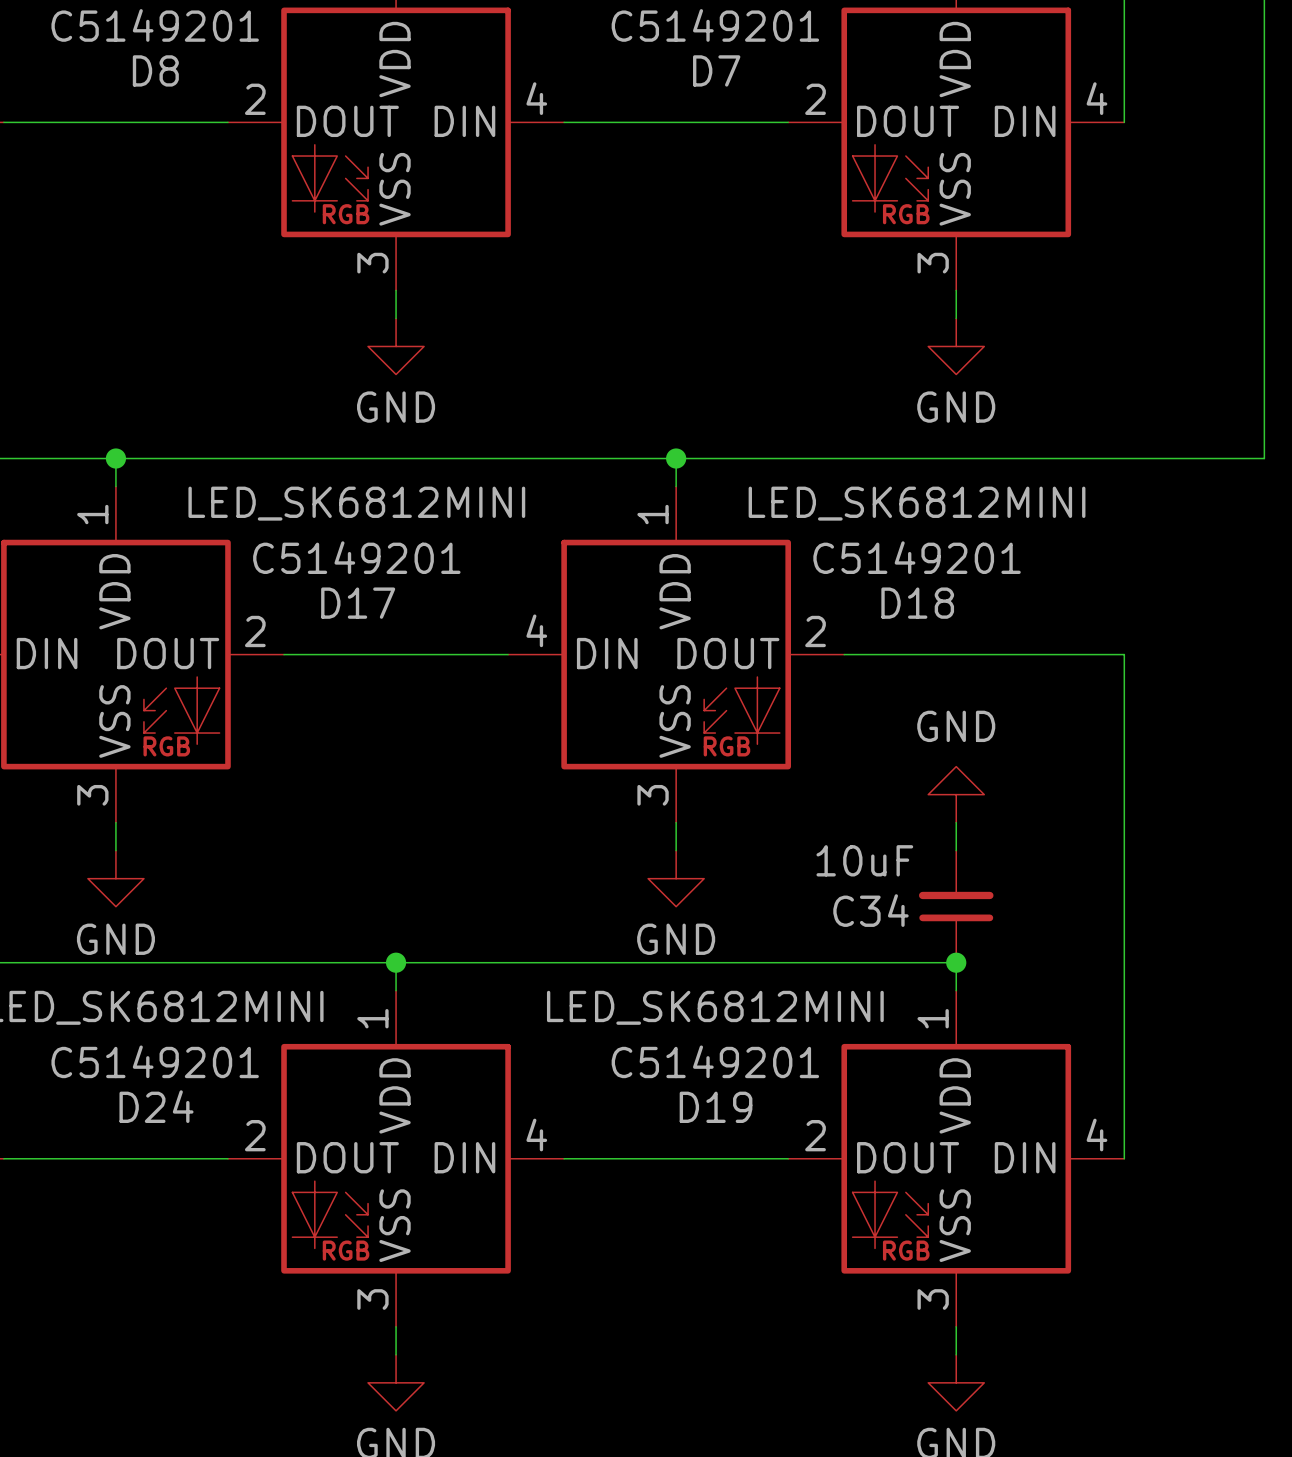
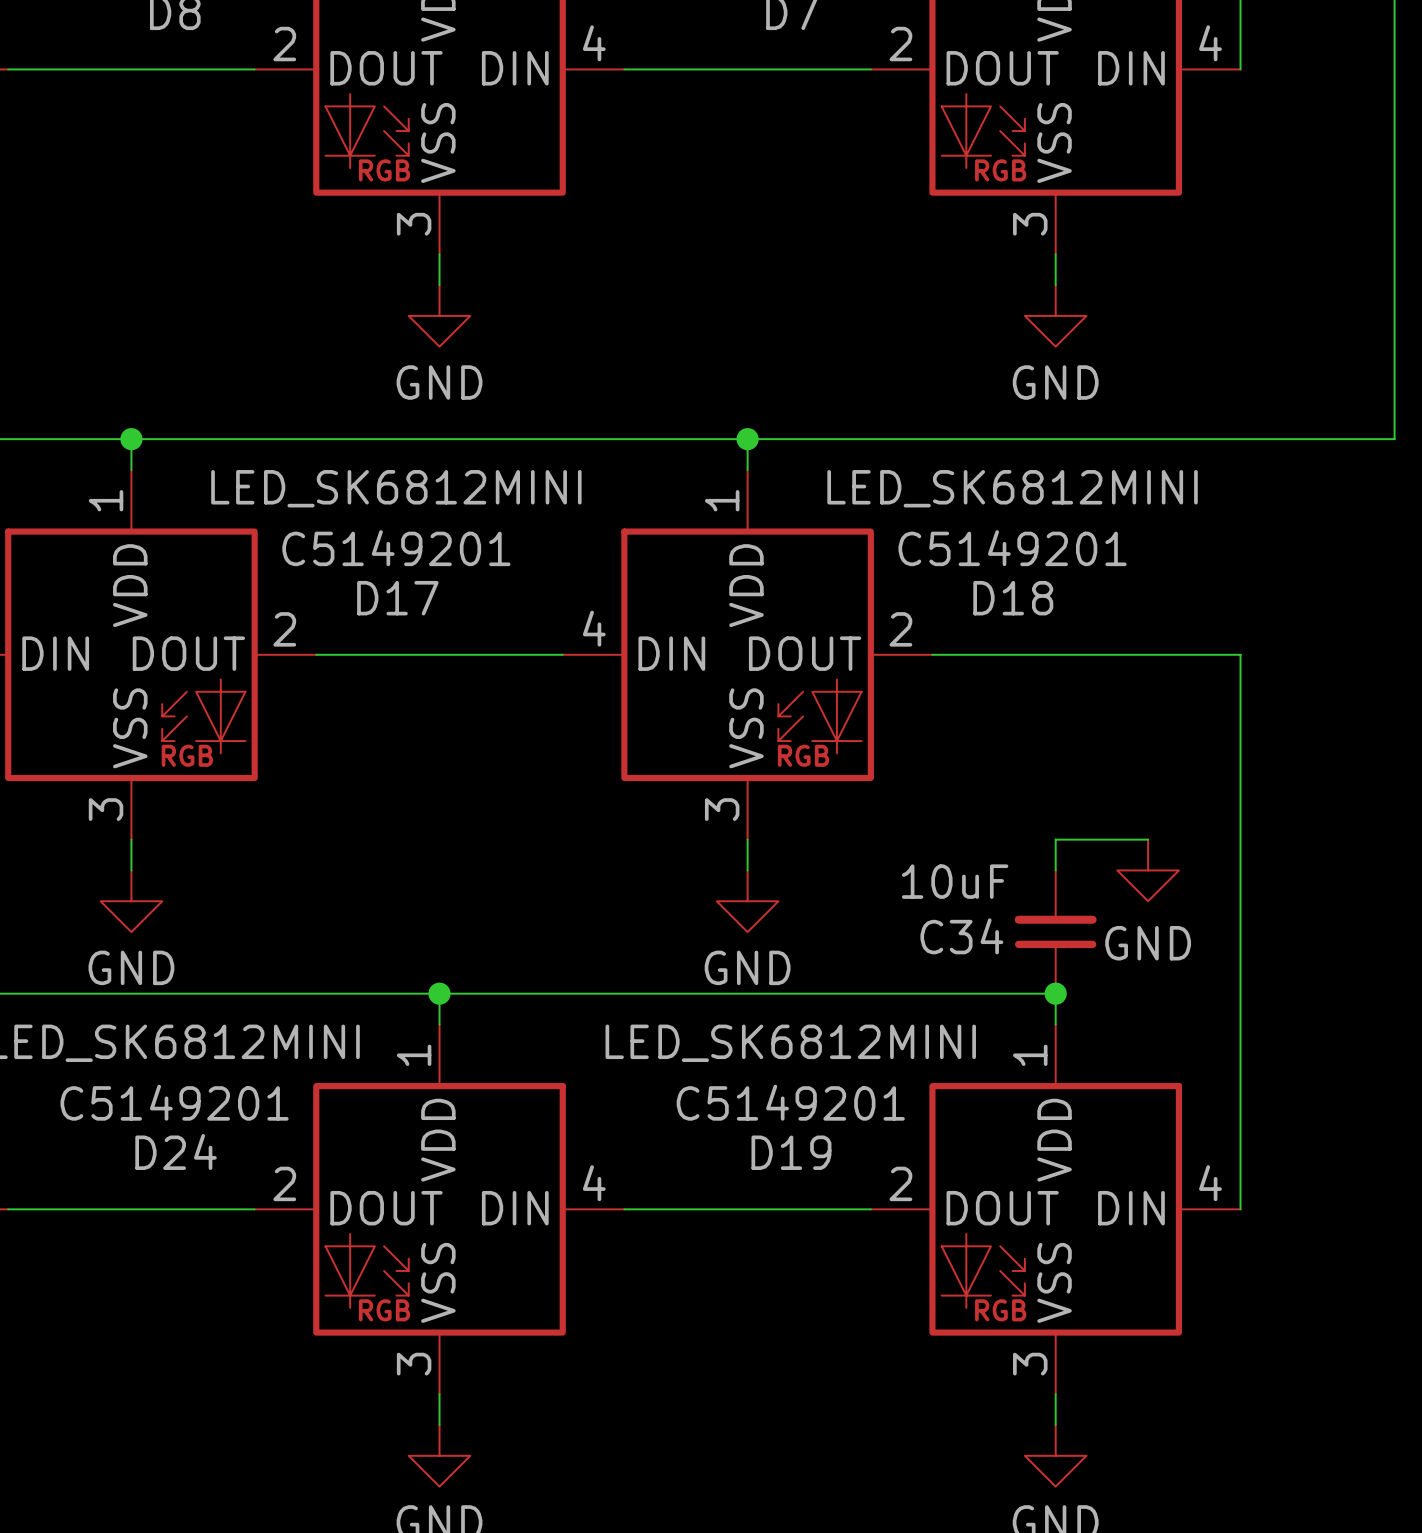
power symbol rotation: 0° (956, 794) -> 180° (1148, 870)
power symbol position: GND (956, 794) -> GND (1148, 870)
wire: none -> (1055, 839) (1148, 839)

